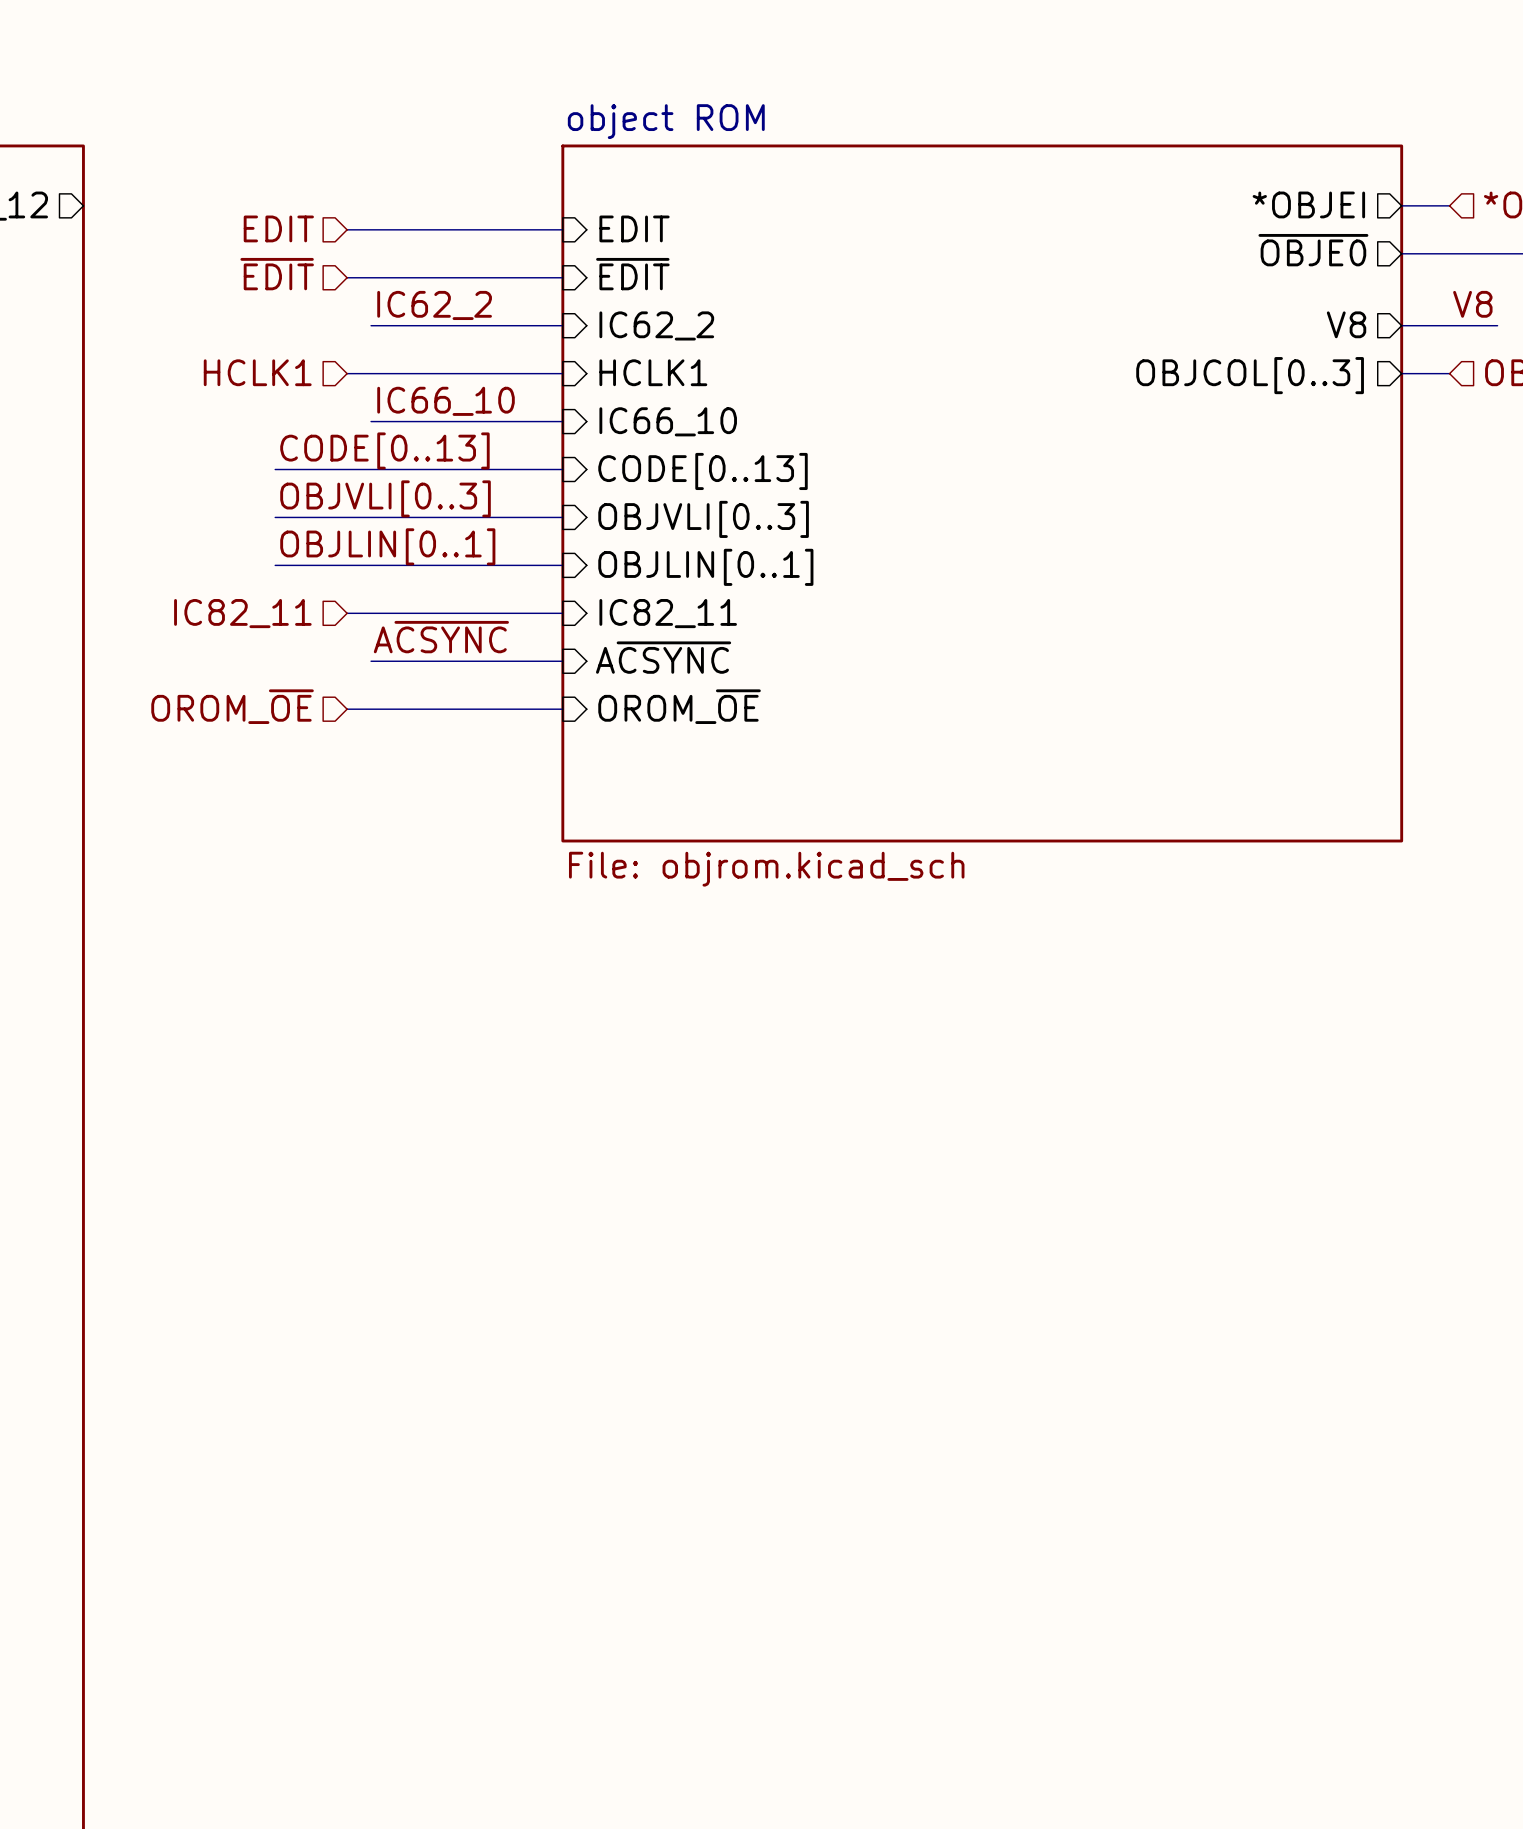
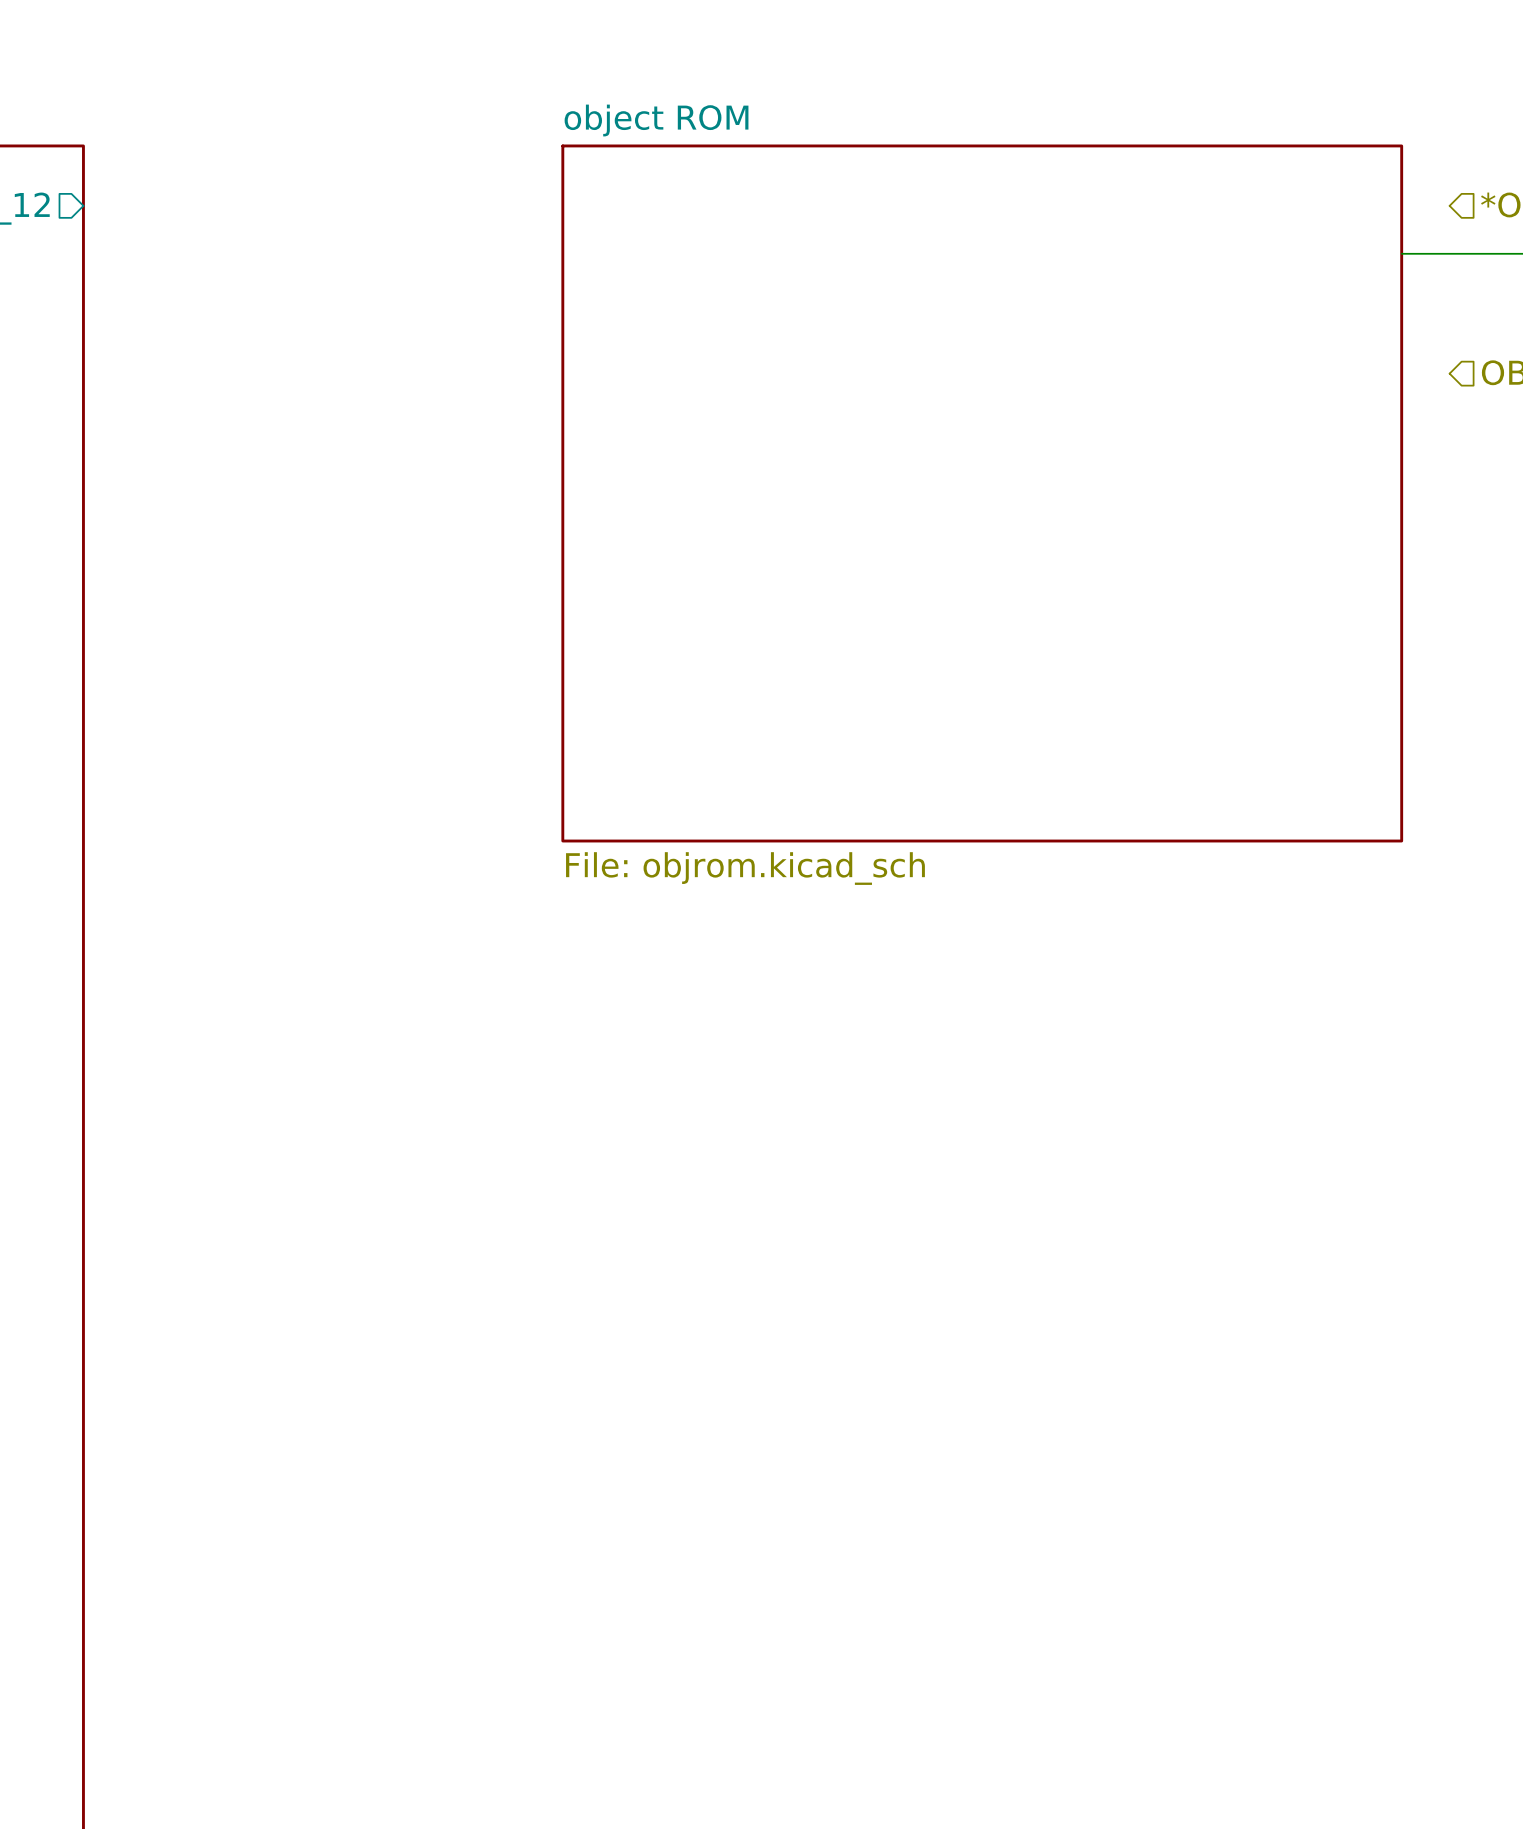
sheet pin: *OBJEI (1308, 204) -> none
wire: (1401, 205) (1449, 205) -> none
hierarchical label: EDIT (278, 228) -> none
sheet pin: EDIT (634, 228) -> none
wire: (347, 229) (562, 229) -> none
sheet pin: ~{OBJE0} (1313, 250) -> none
hierarchical label: ~{EDIT} (277, 274) -> none
sheet pin: ~{EDIT} (632, 274) -> none
wire: (347, 277) (562, 277) -> none
label: V8 (1472, 304) -> none
label: IC62_2 (434, 305) -> none
sheet pin: V8 (1346, 324) -> none
wire: (371, 325) (562, 325) -> none
sheet pin: IC62_2 (656, 325) -> none
wire: (1401, 325) (1497, 325) -> none
hierarchical label: HCLK1 (257, 372) -> none
sheet pin: HCLK1 (653, 372) -> none
wire: (347, 373) (562, 373) -> none
wire: (1401, 373) (1449, 373) -> none
sheet pin: OBJCOL[0..3] (1250, 375) -> none
label: IC66_10 (446, 401) -> none
wire: (371, 421) (562, 421) -> none
sheet pin: IC66_10 (668, 421) -> none
label: CODE[0..13] (384, 450) -> none
bus: (275, 469) (562, 469) -> none
sheet pin: CODE[0..13] (703, 471) -> none
label: OBJVLI[0..3] (385, 498) -> none
bus: (275, 517) (562, 517) -> none
sheet pin: OBJVLI[0..3] (703, 519) -> none
label: OBJLIN[0..1] (387, 546) -> none
bus: (275, 565) (562, 565) -> none
sheet pin: OBJLIN[0..1] (705, 567) -> none
hierarchical label: IC82_11 (242, 613) -> none
wire: (347, 613) (562, 613) -> none
sheet pin: IC82_11 (668, 613) -> none
label: A~{CSYNC} (441, 637) -> none
sheet pin: A~{CSYNC} (663, 657) -> none
wire: (371, 661) (562, 661) -> none
hierarchical label: OROM_~{OE} (232, 706) -> none
sheet pin: OROM_~{OE} (679, 706) -> none
wire: (347, 709) (562, 709) -> none

